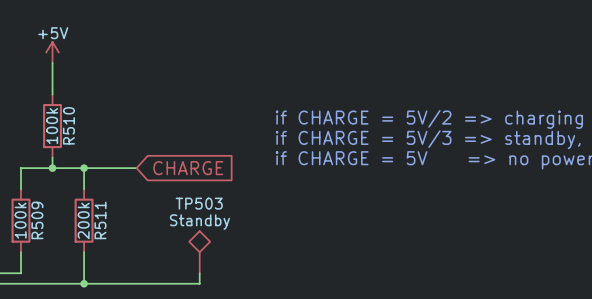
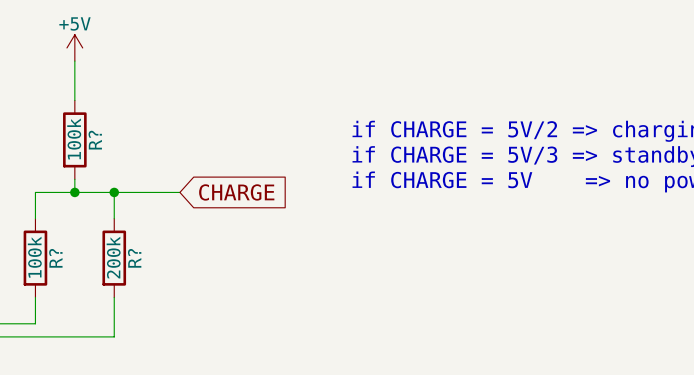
R510 name: R510 (68, 125) -> R? (95, 140)
R509 name: R509 (37, 220) -> R? (55, 258)
R511 name: R511 (100, 220) -> R? (134, 258)
TP503: Standby (199, 252) -> none
wire: (199, 273) (199, 283) (84, 283) -> none
junction: (84, 283) -> none

